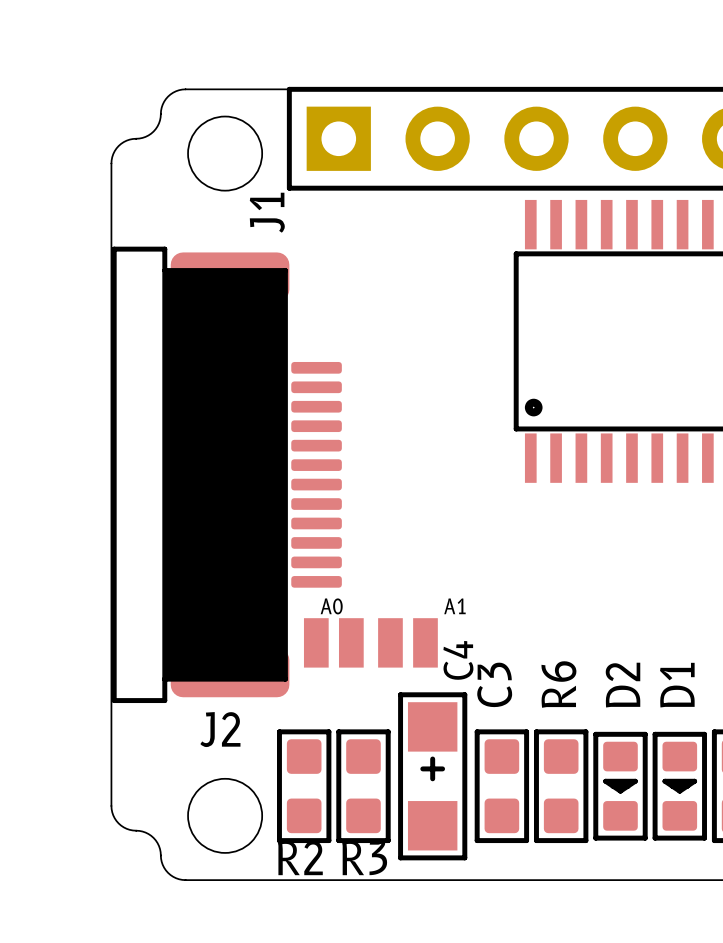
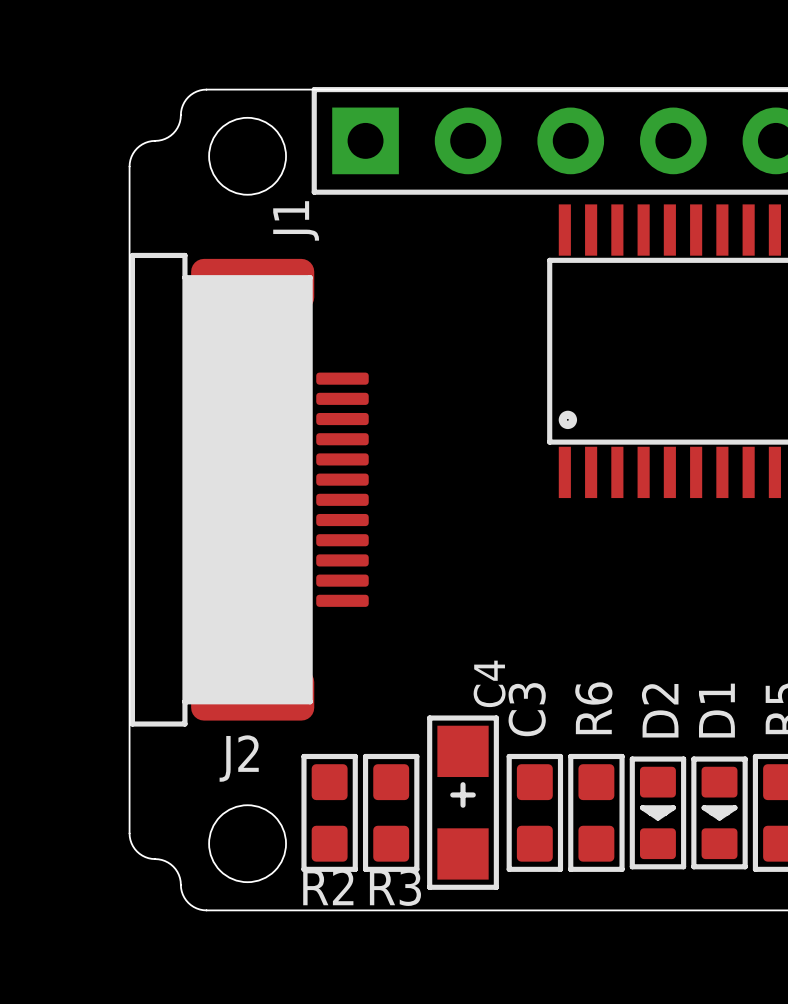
A0: (333, 642) -> none
A1: (407, 642) -> none

